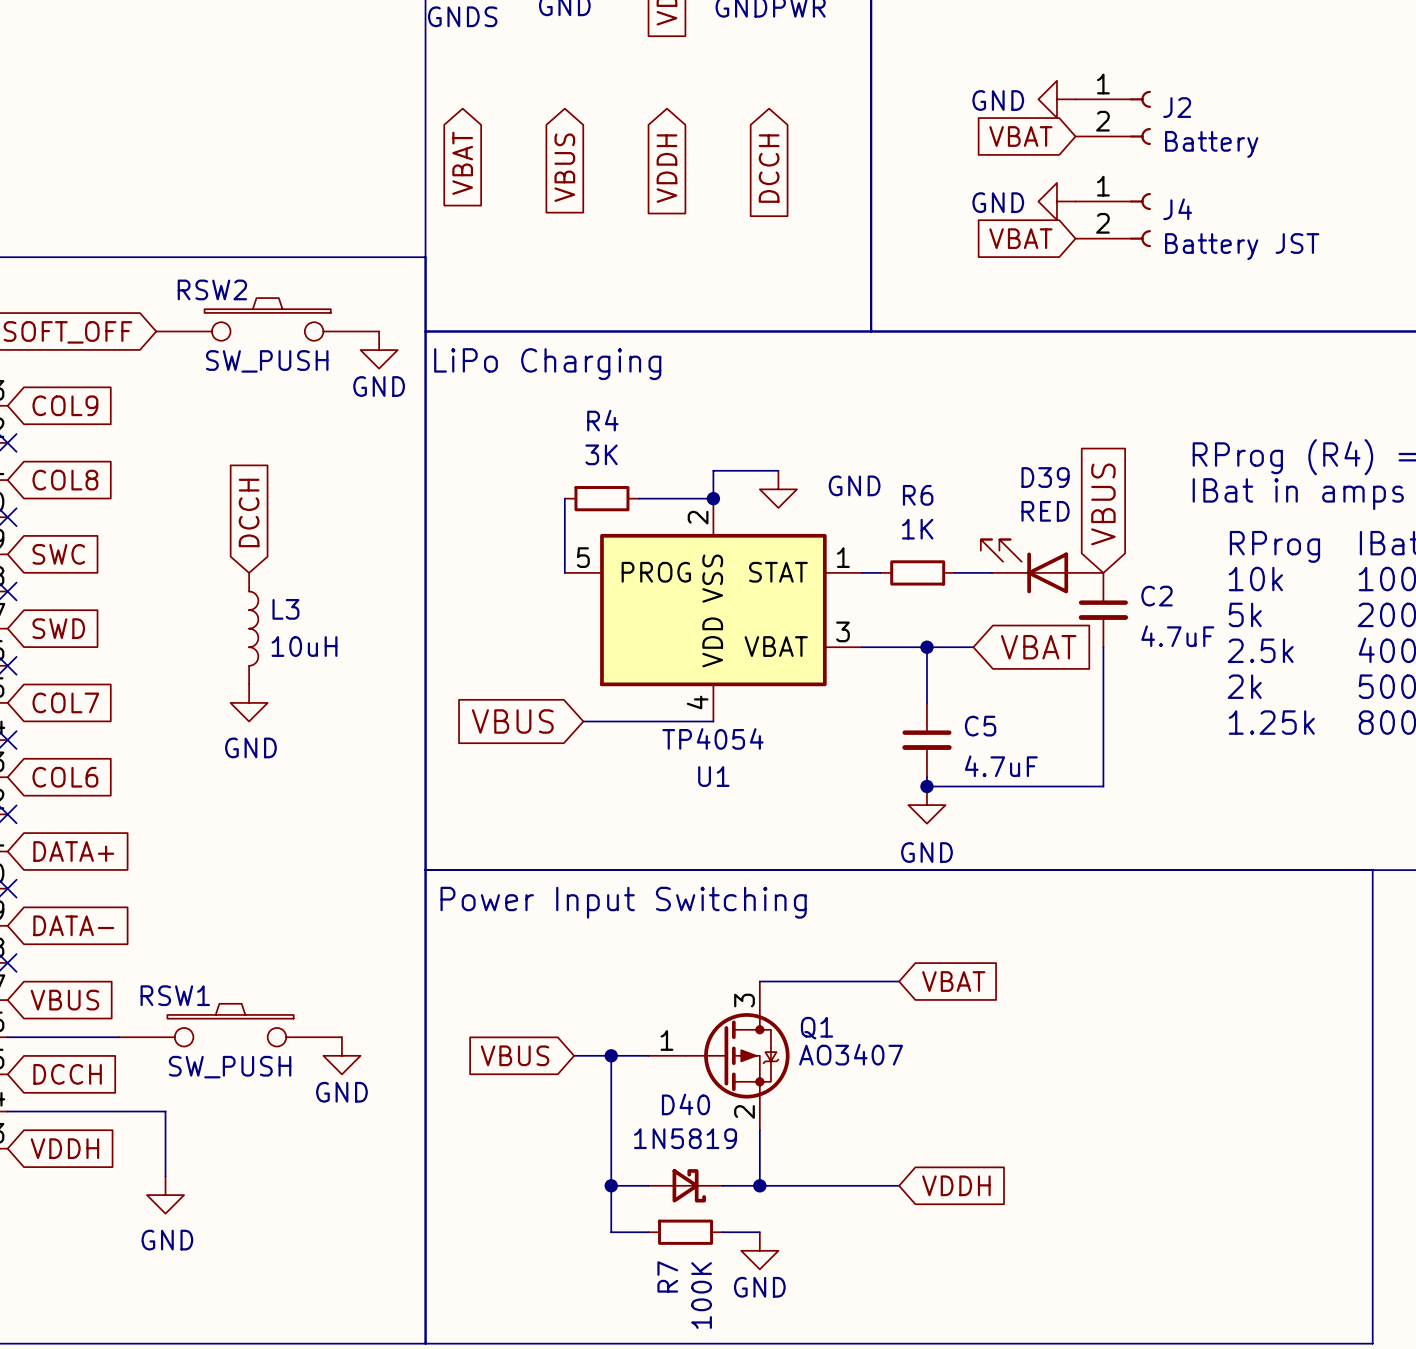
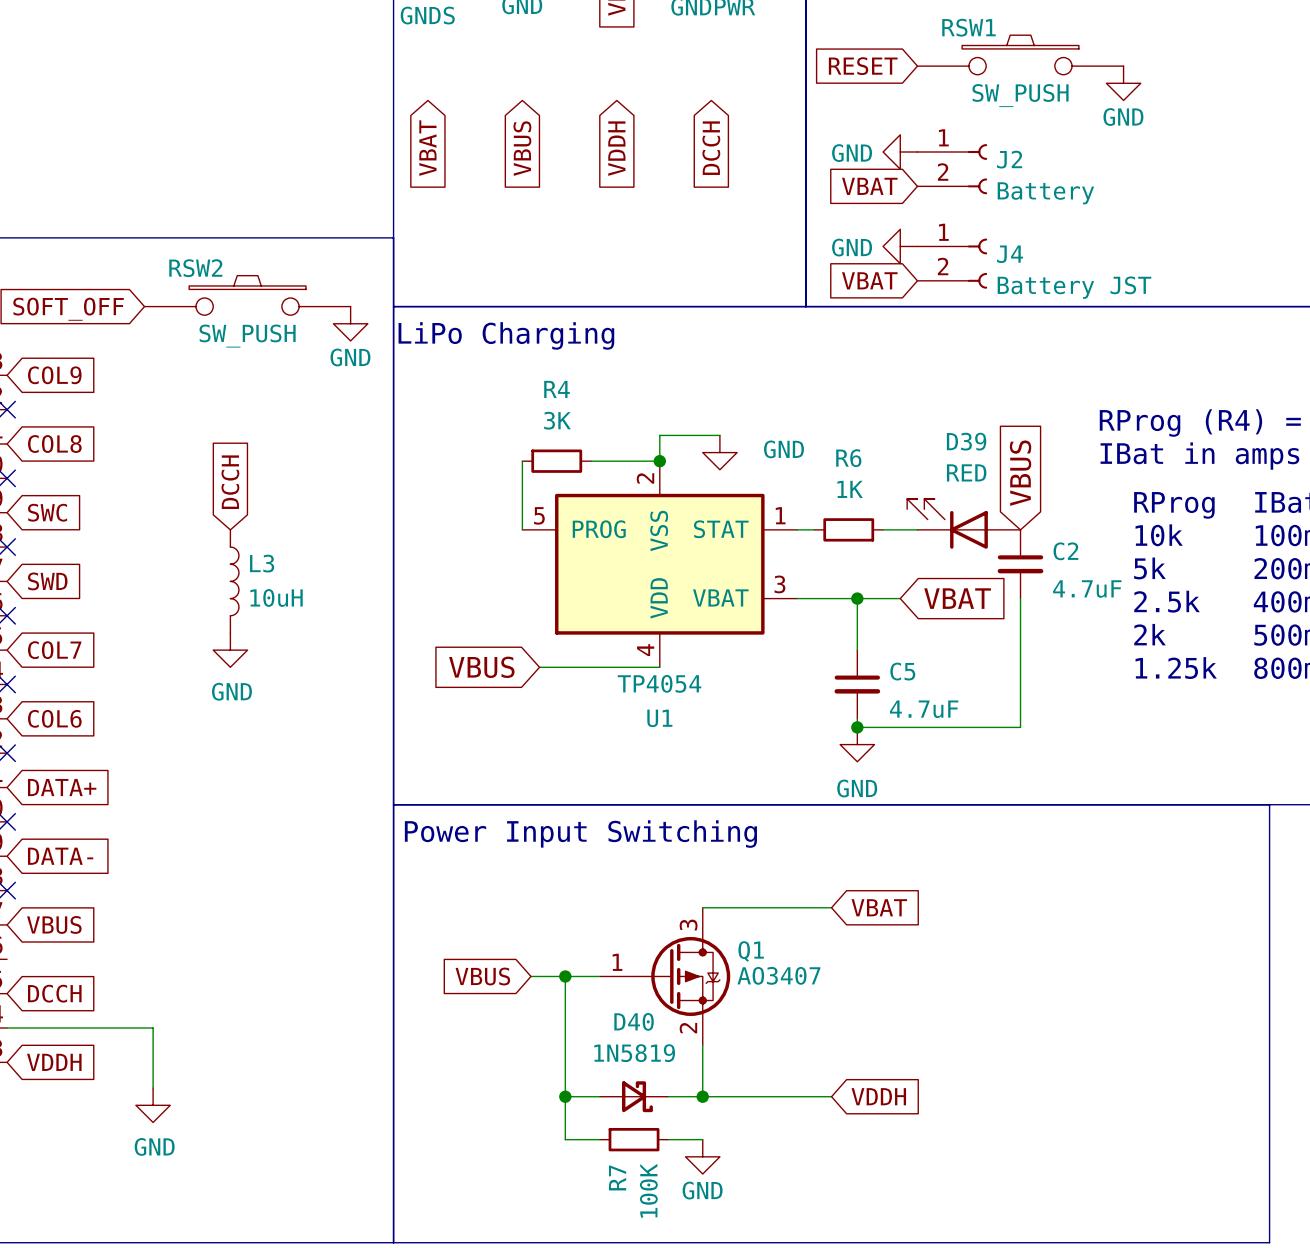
global label: none -> RESET (863, 66)
power symbol: none -> GND (1123, 83)
power symbol: GND (1056, 99) -> none
J2 position: (1113, 117) -> (952, 169)
global label: VBAT (1020, 136) -> none
power symbol: none -> GND (900, 152)
power symbol: GND (1056, 201) -> none
J4 position: (1113, 220) -> (952, 263)
global label position: VBAT (1020, 238) -> VBAT (869, 186)
power symbol: none -> GND (900, 246)
global label: none -> VBAT (869, 280)
RSW1 position: (230, 1025) -> (1020, 54)
wire: (7, 1037) (119, 1037) -> none
power symbol: GND (341, 1055) -> none

